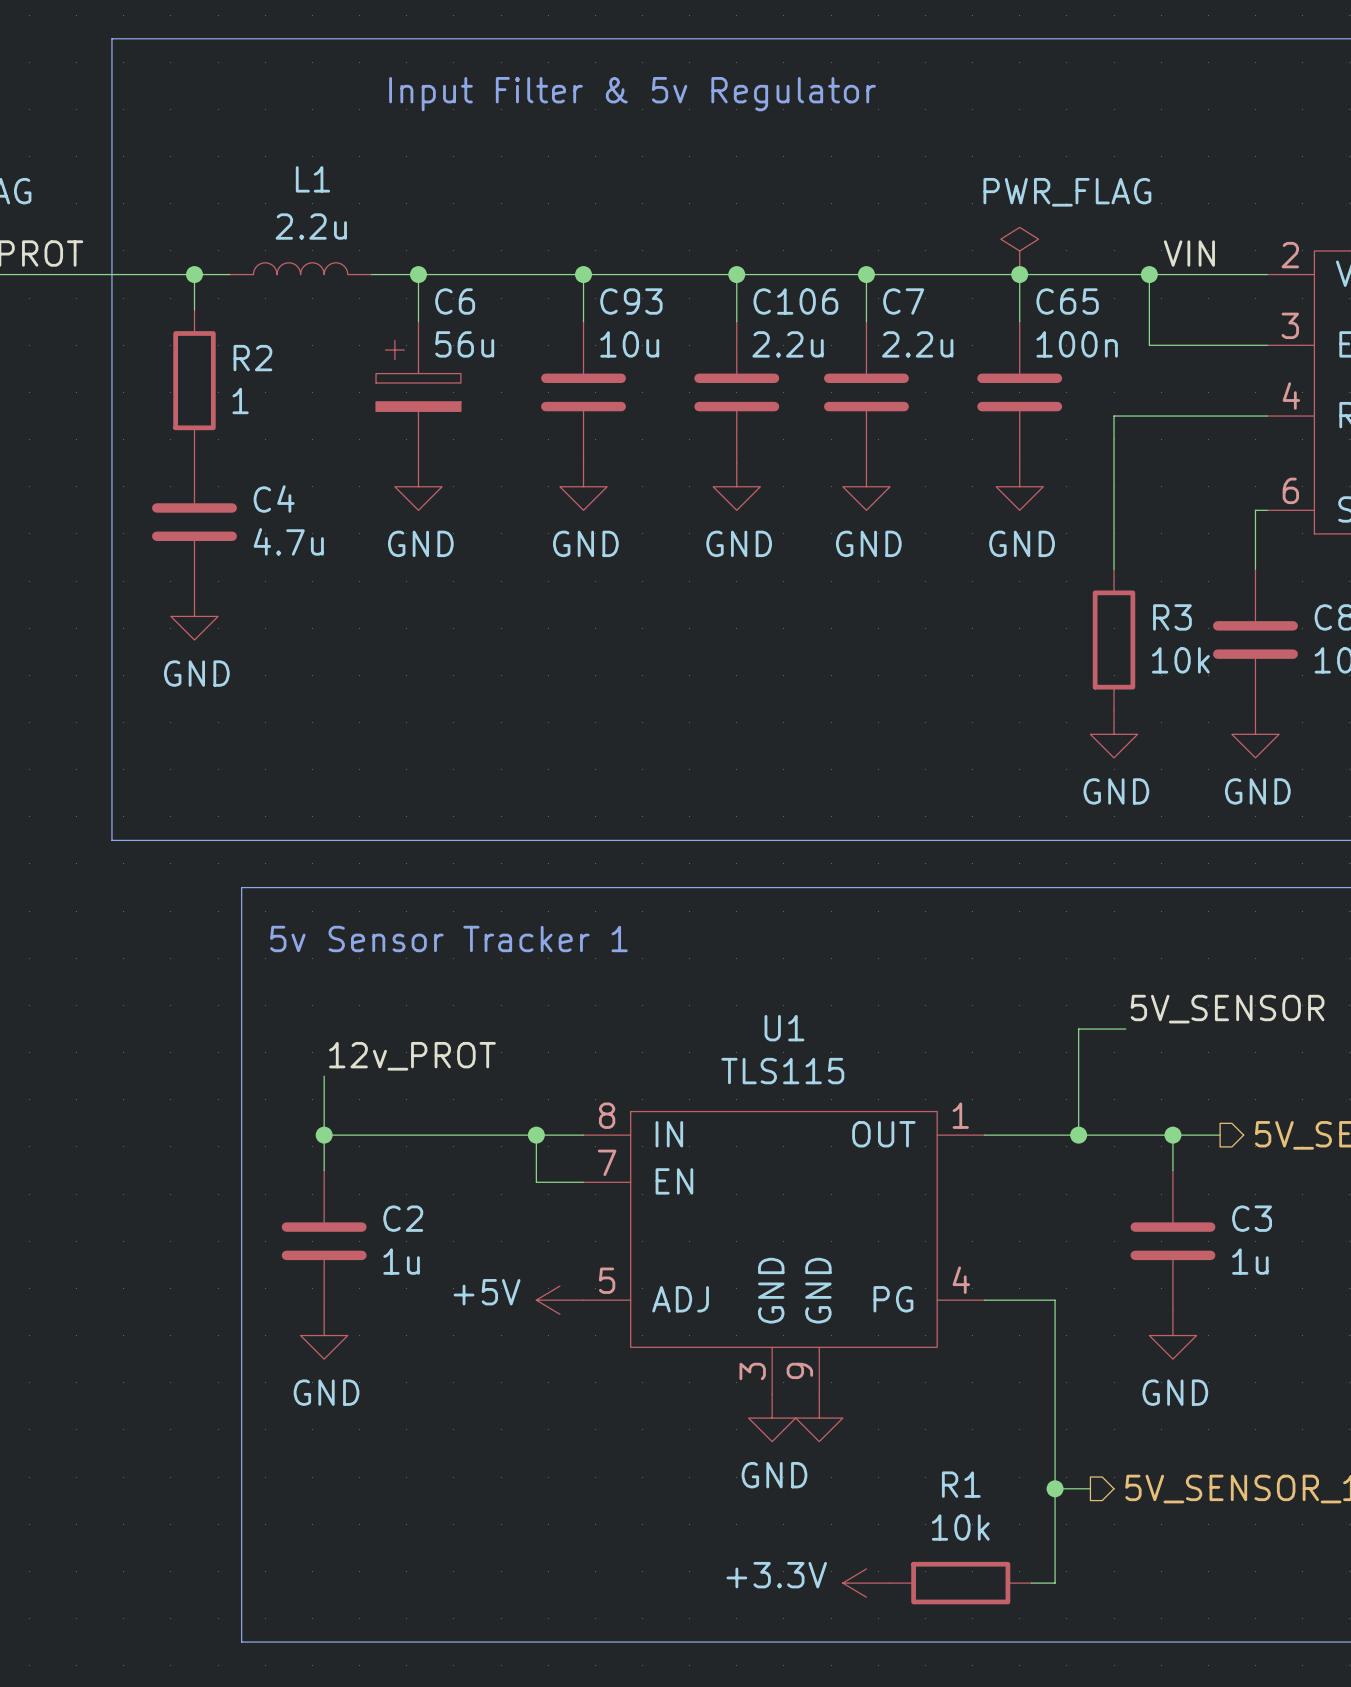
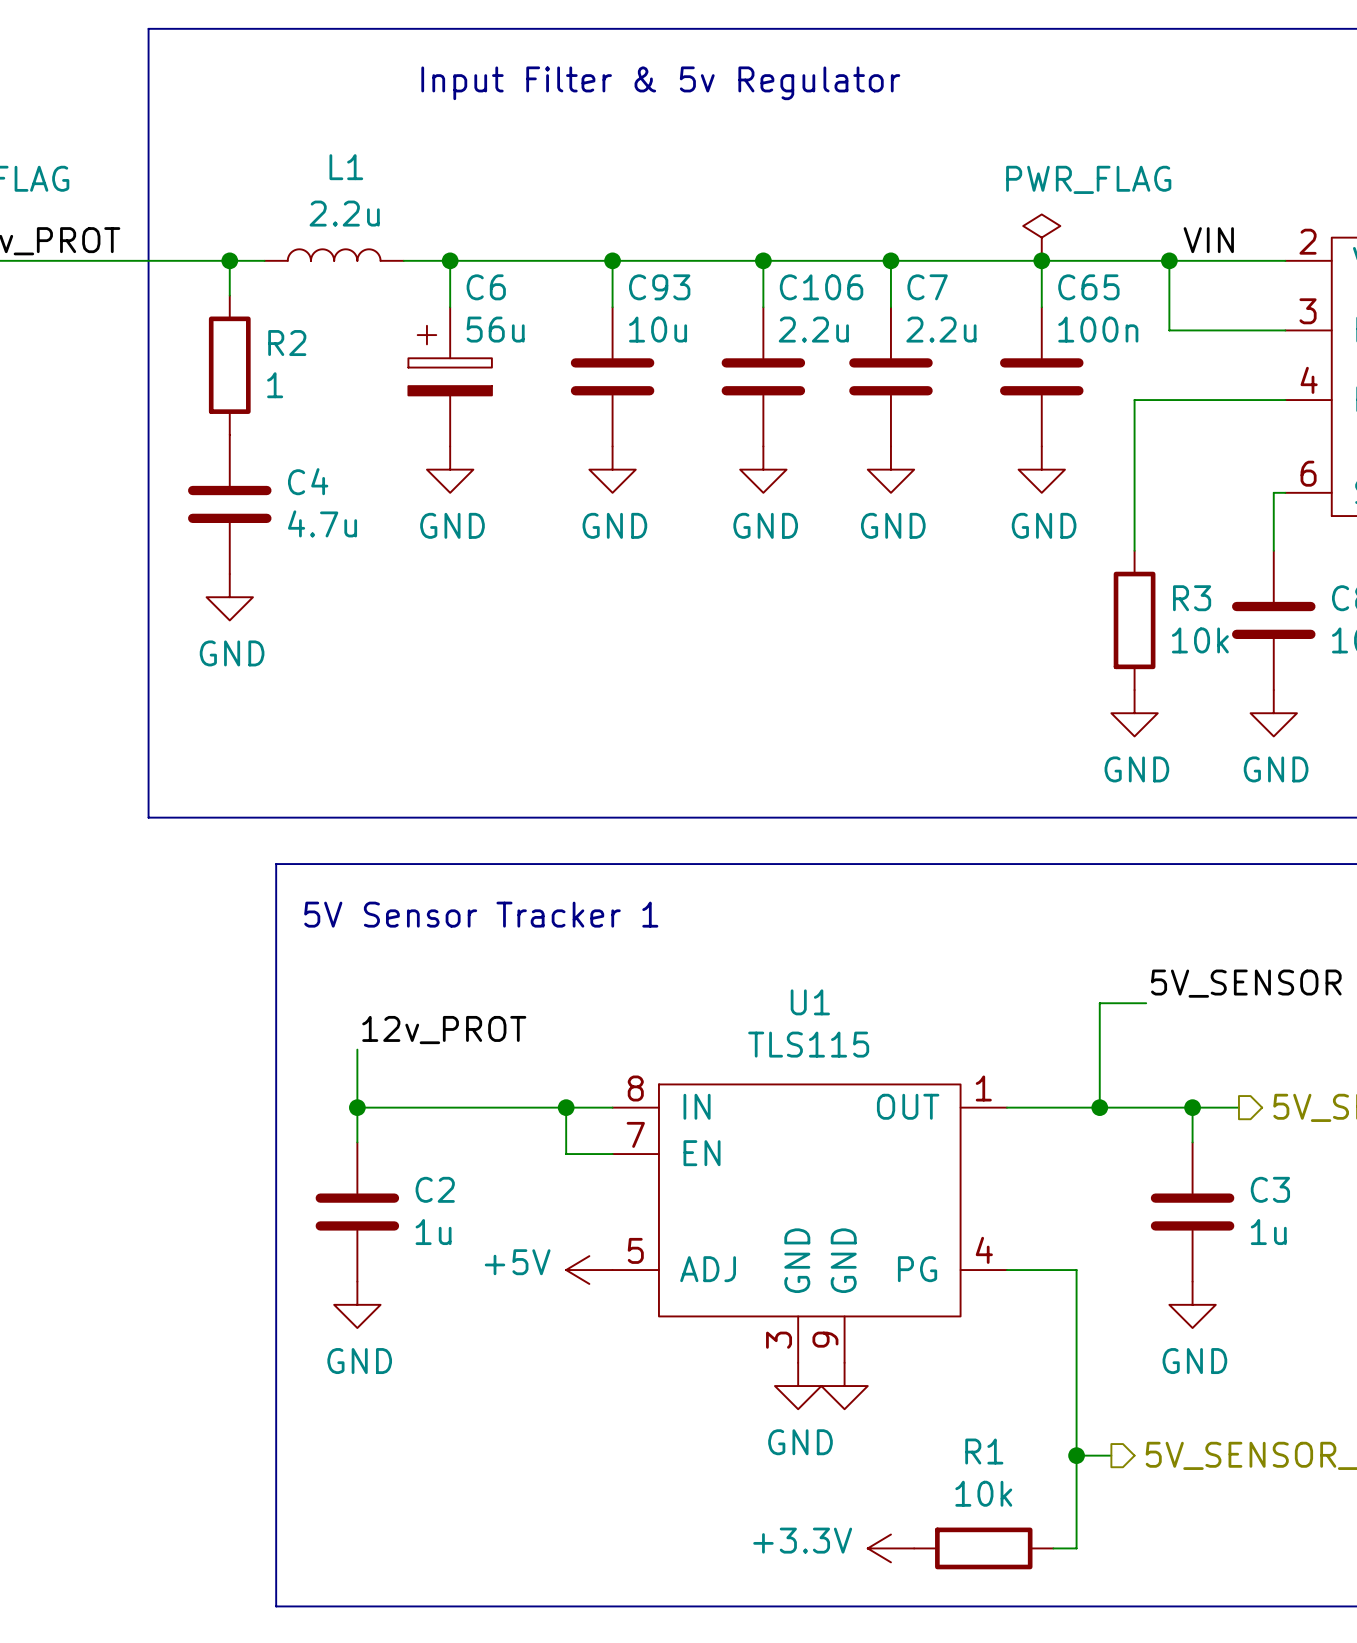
text: 5v Sensor Tracker 1 (448, 938) -> 5V Sensor Tracker 1 (481, 914)

